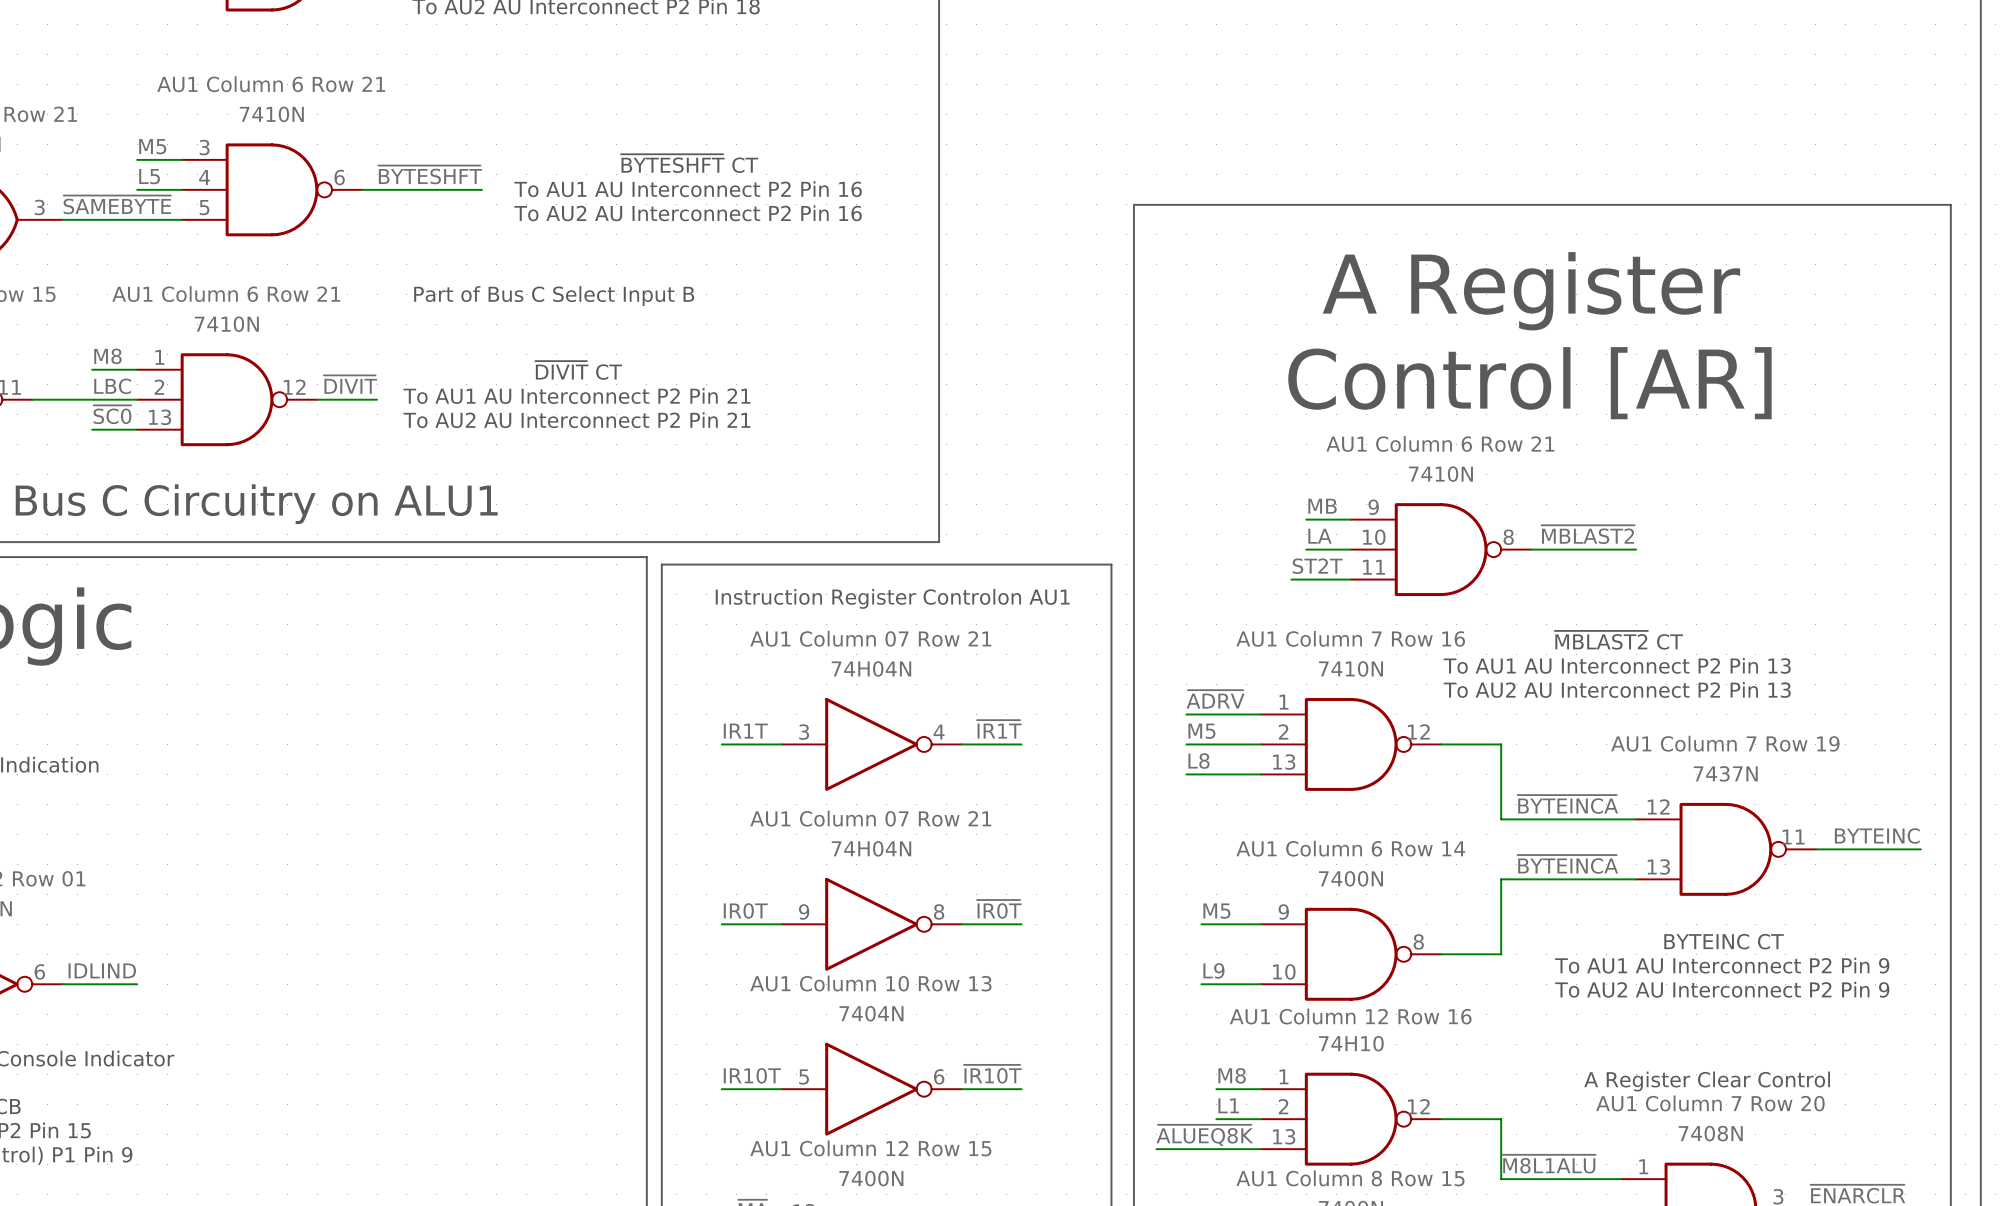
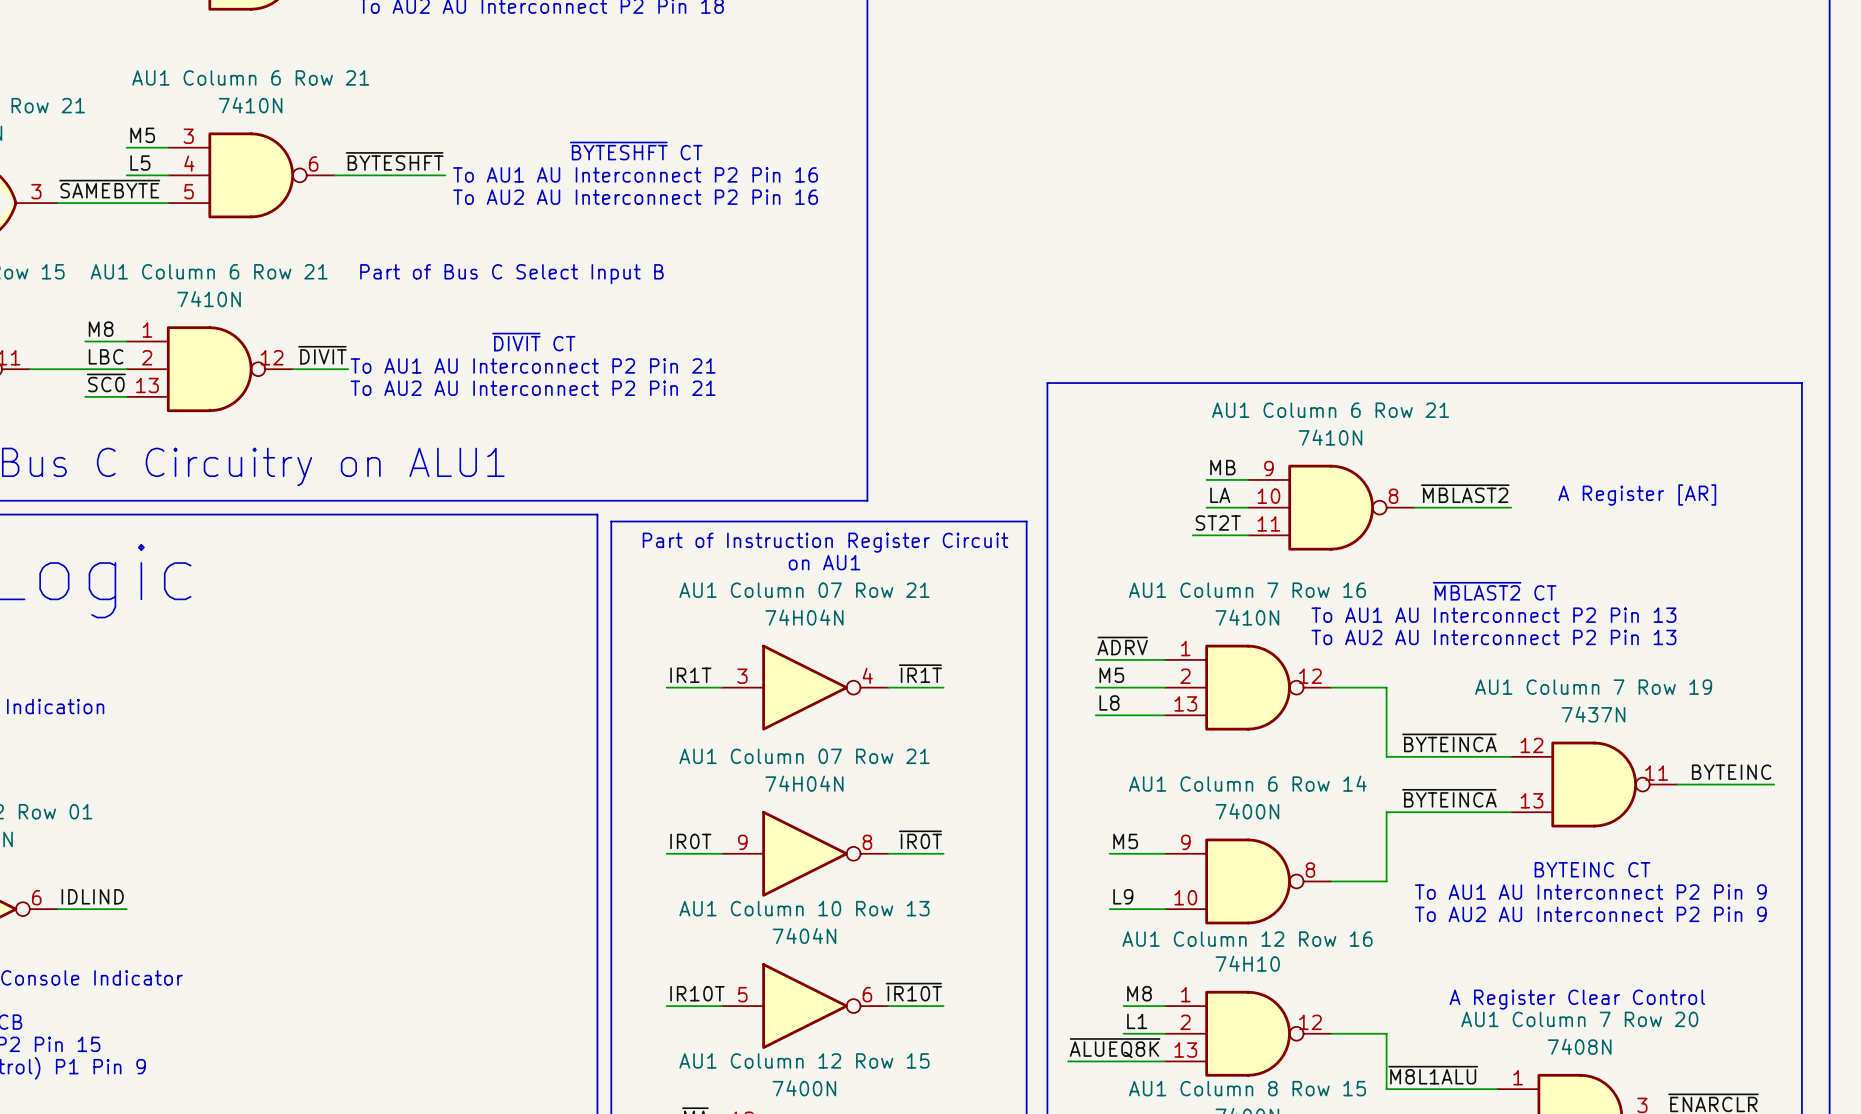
text: A Register (1531, 291) -> none
text: Control [AR] (1529, 383) -> none
line: (1133, 414) (1133, 204) (1950, 204) (1950, 414) -> (1047, 383) (1801, 383)
text: none -> A Register [AR] (1637, 494)
text: Instruction Register Controlon AU1 (892, 598) -> Part of Instruction Register Circuit (825, 542)
text: none -> on AU1 (824, 562)

